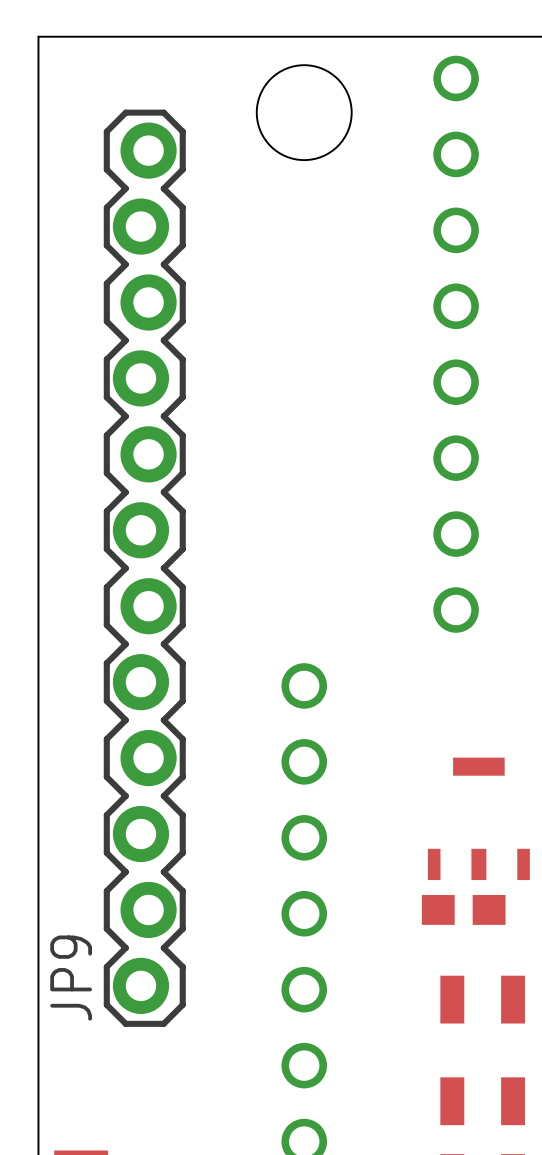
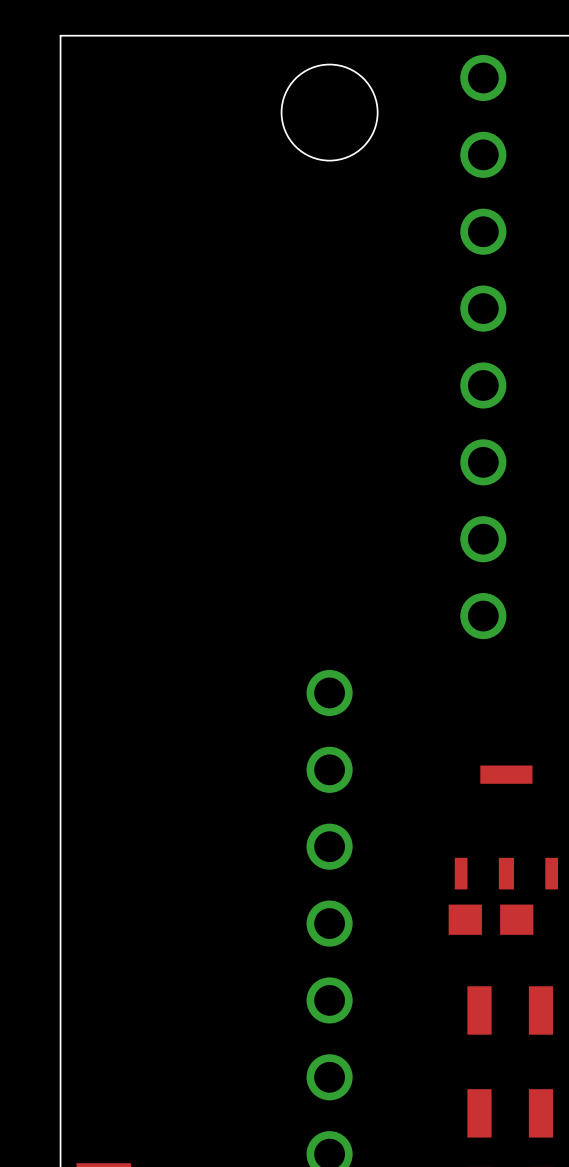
JP9: (144, 568) -> none

